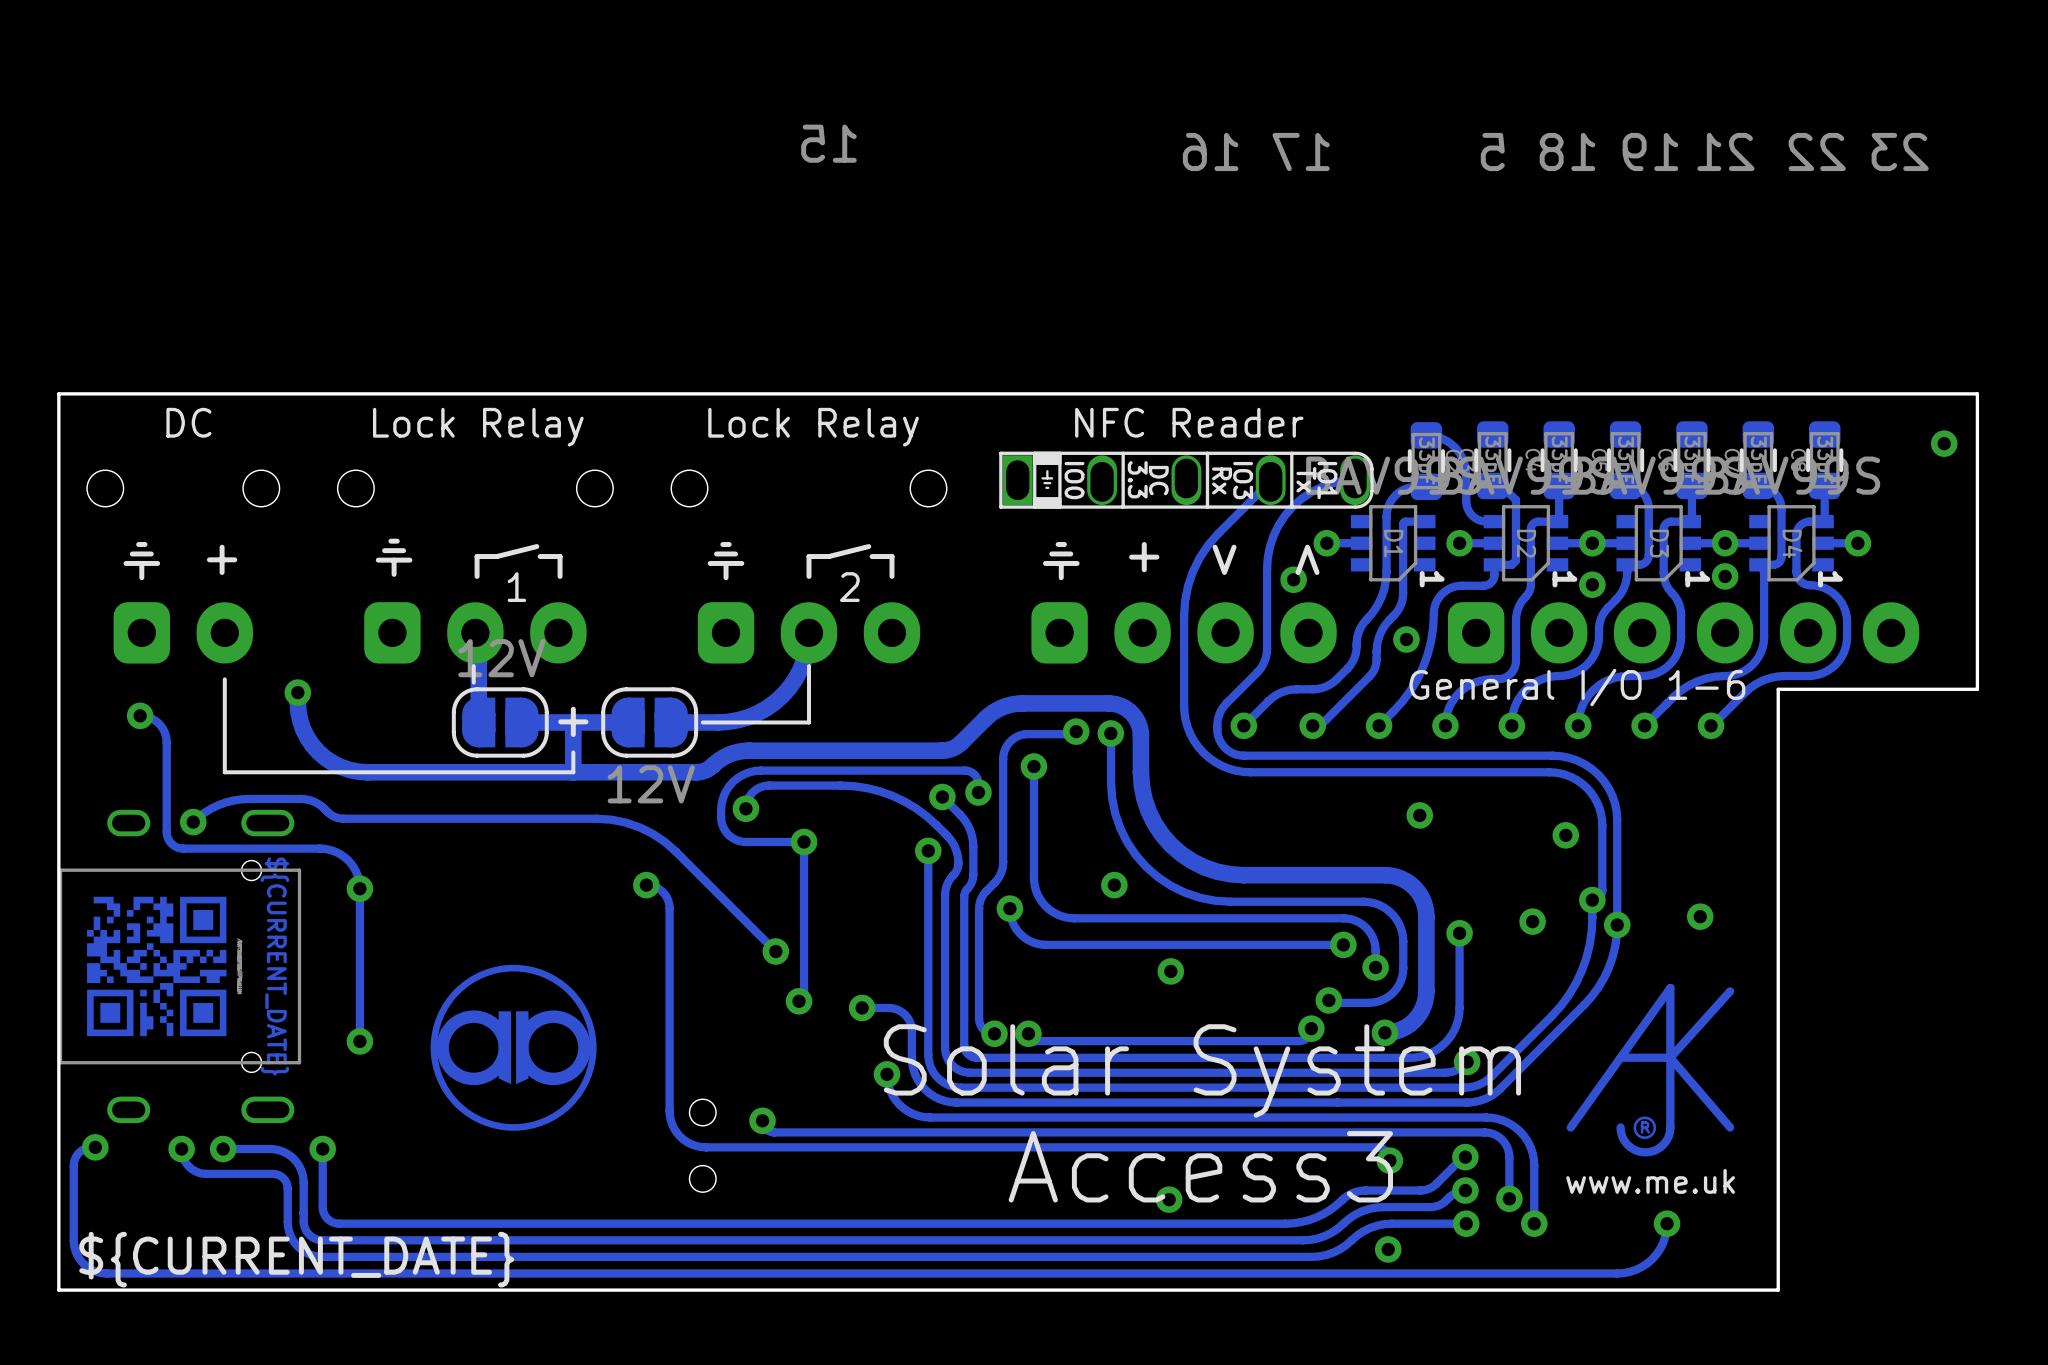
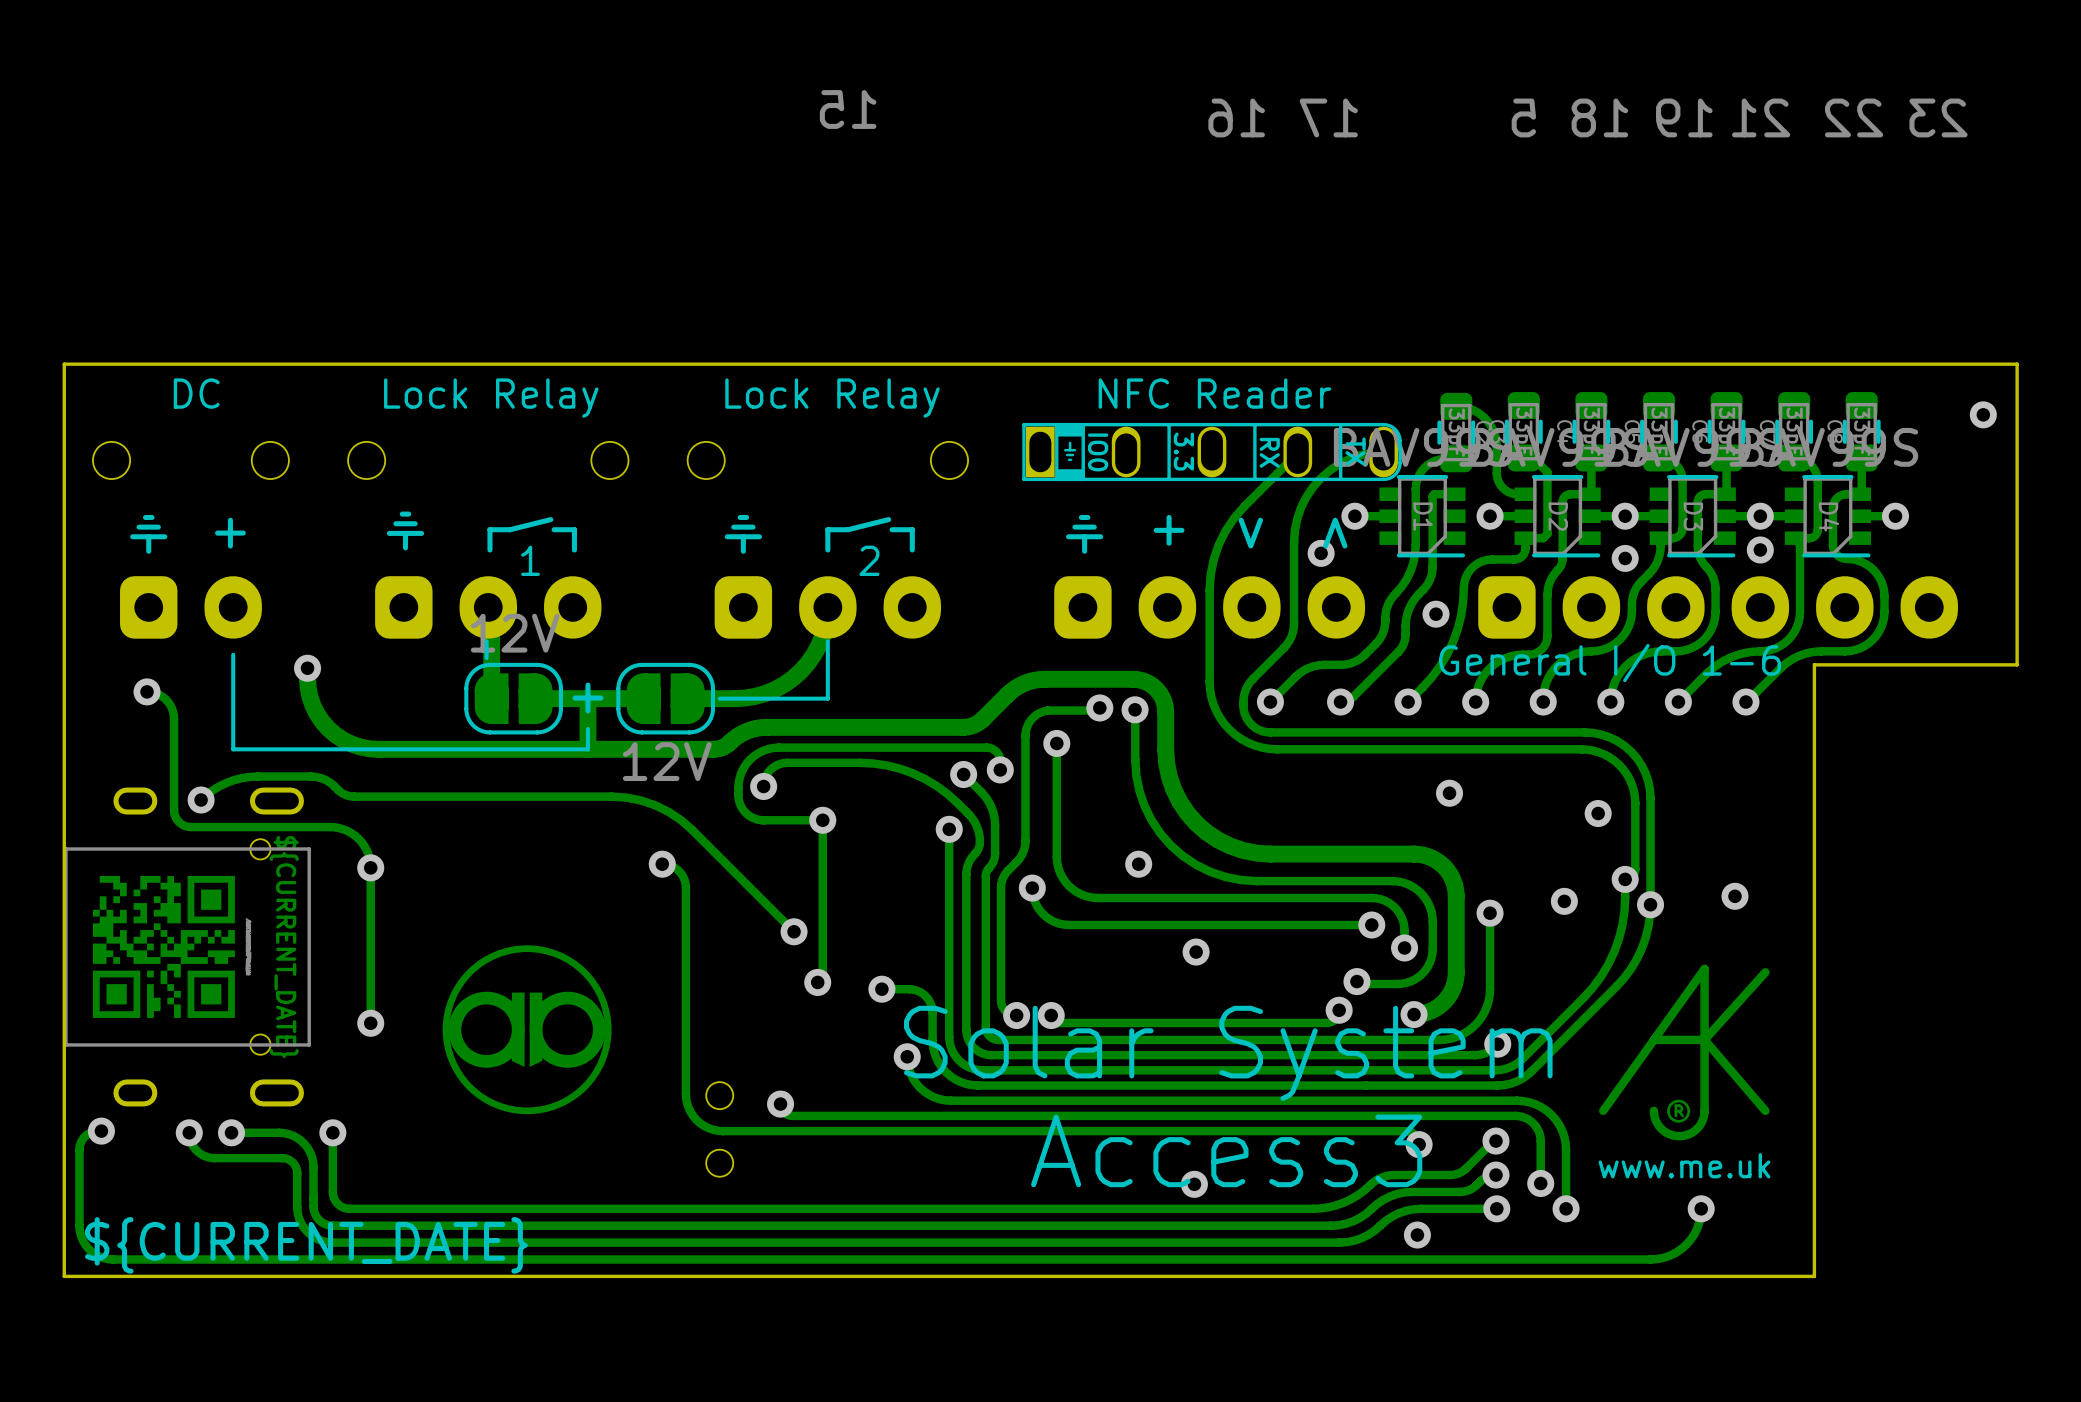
part footprint: [999, 451, 1374, 509] -> [1022, 422, 1402, 482]
D1 footprint: [1350, 505, 1436, 582] -> [1379, 474, 1466, 558]
D2 footprint: [1483, 505, 1569, 582] -> [1514, 474, 1601, 558]
D3 footprint: [1616, 505, 1702, 582] -> [1649, 474, 1736, 558]
D4 footprint: [1749, 505, 1834, 582] -> [1784, 474, 1871, 558]

